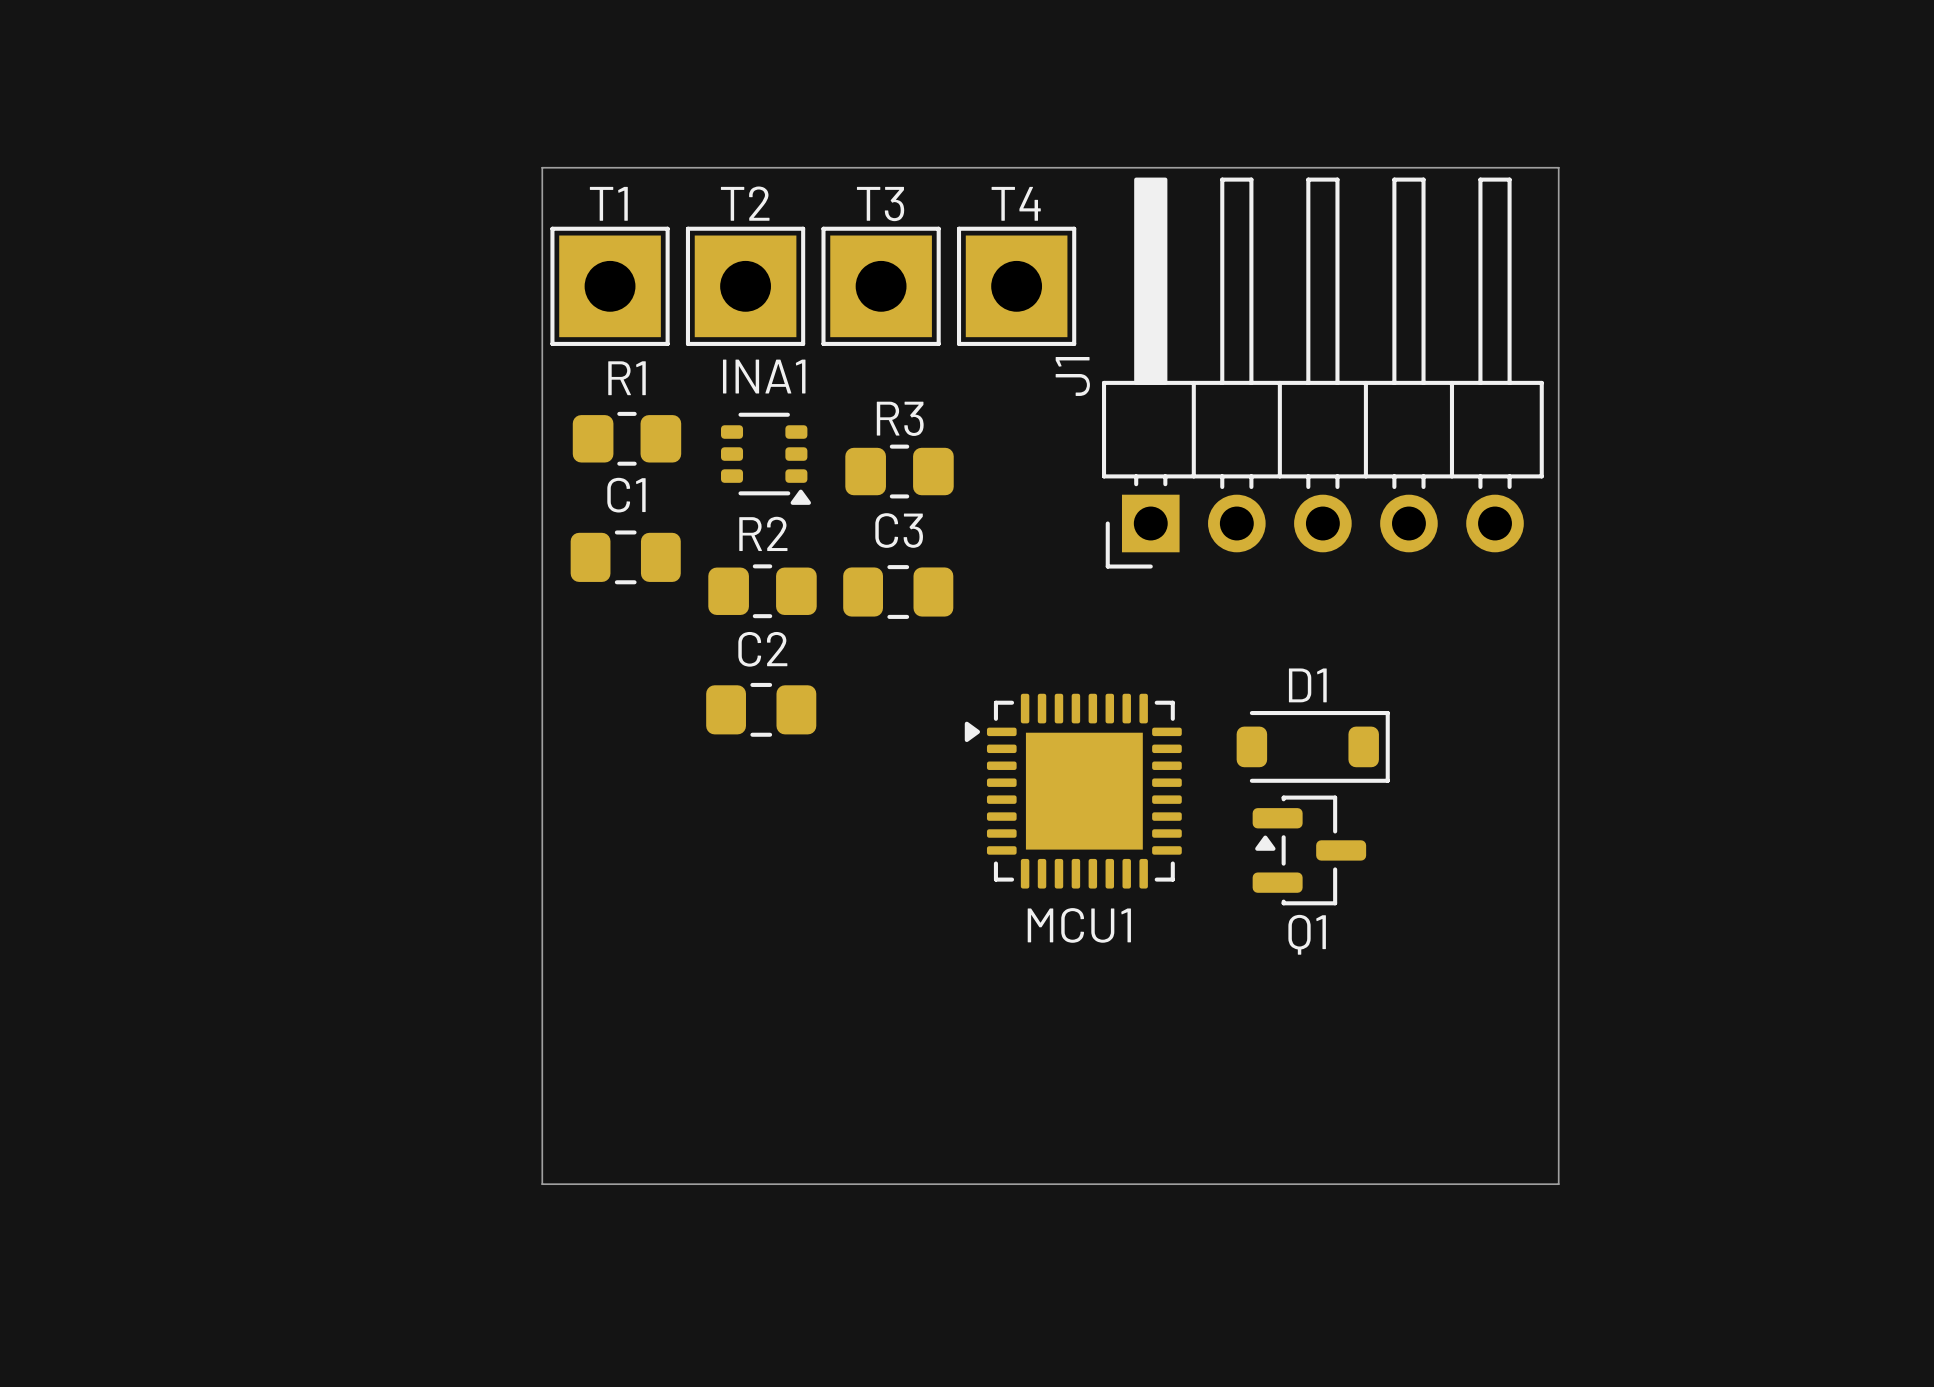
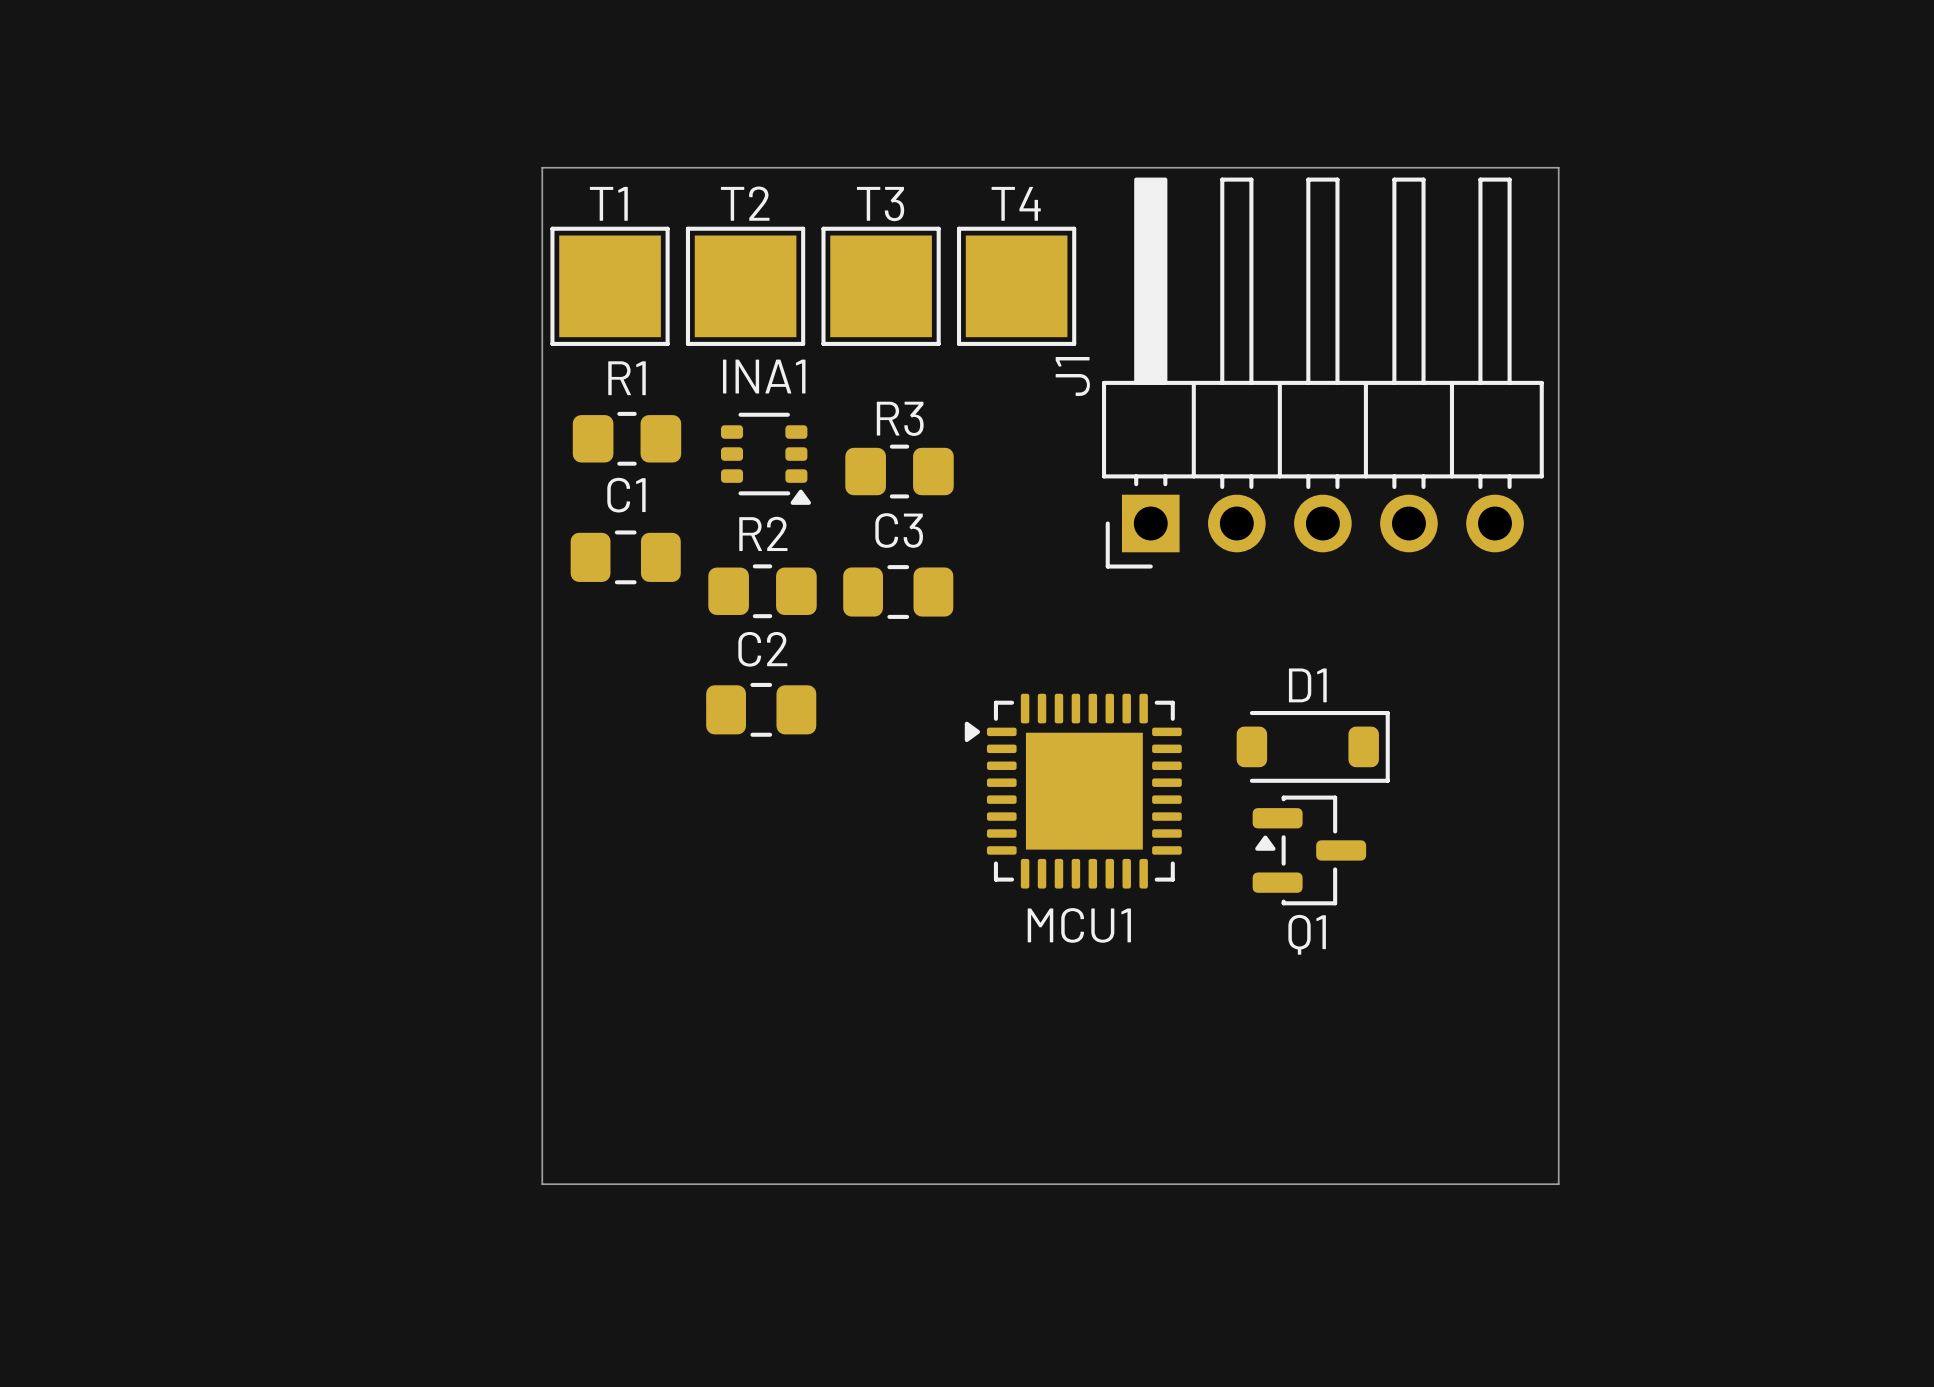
T1 footprint: [550, 226, 670, 346] -> [550, 226, 670, 346]
T2 footprint: [685, 226, 806, 346] -> [685, 226, 806, 346]
T3 footprint: [821, 226, 941, 346] -> [821, 226, 941, 346]
T4 footprint: [956, 226, 1077, 346] -> [956, 226, 1077, 346]

